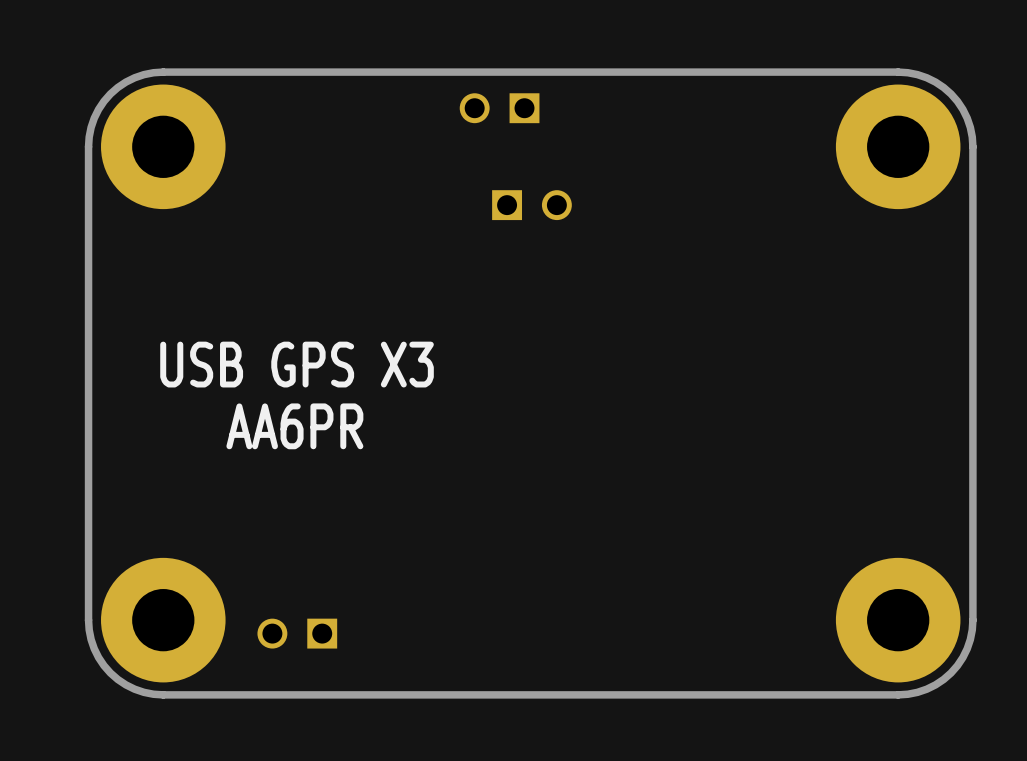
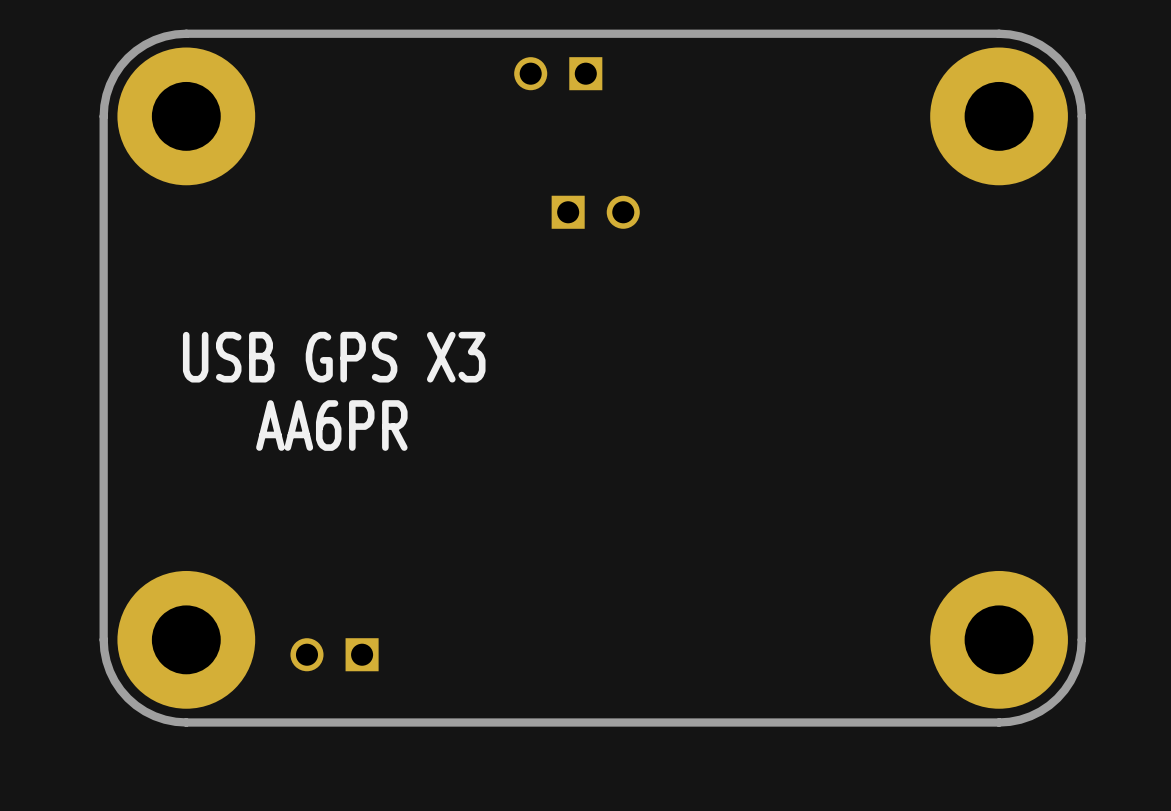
part position: (531, 205) -> (595, 212)

